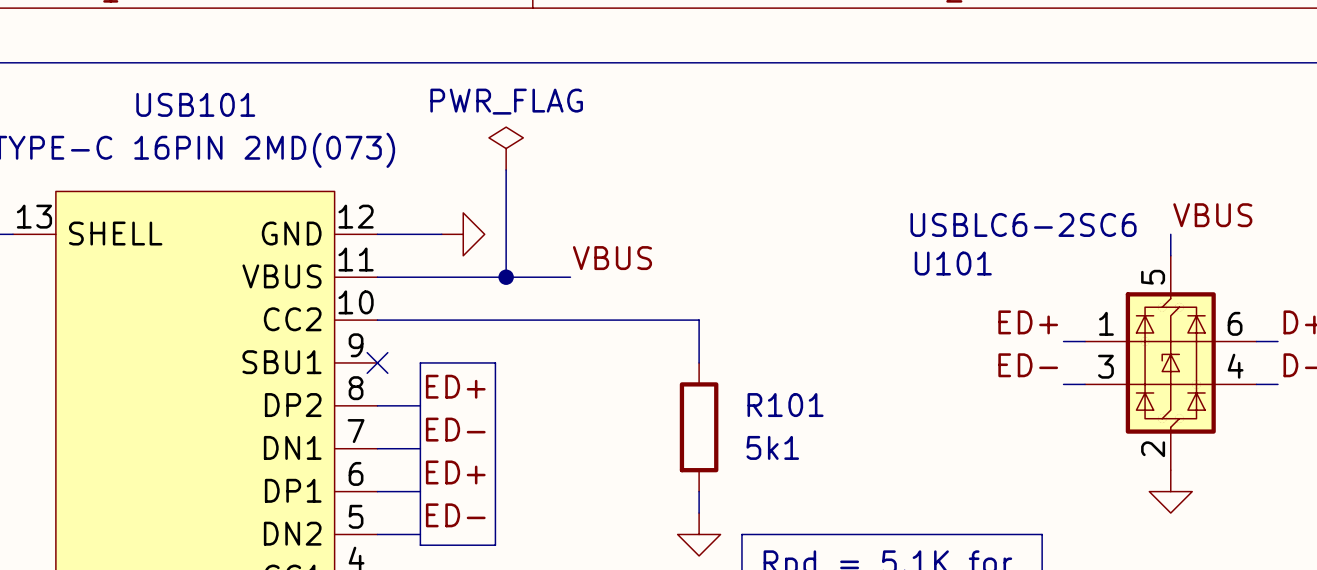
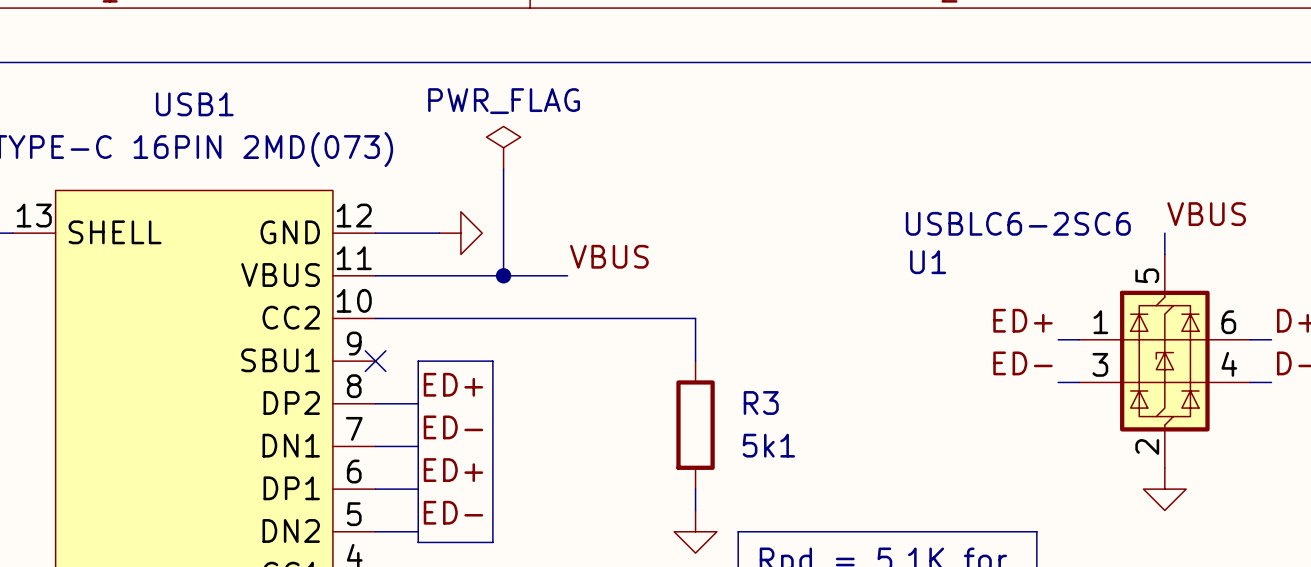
USB101 name: USB101 (195, 104) -> USB1 (194, 104)
U101 name: U101 (953, 263) -> U1 (928, 262)
R101 name: R101 (785, 405) -> R3 (761, 402)

